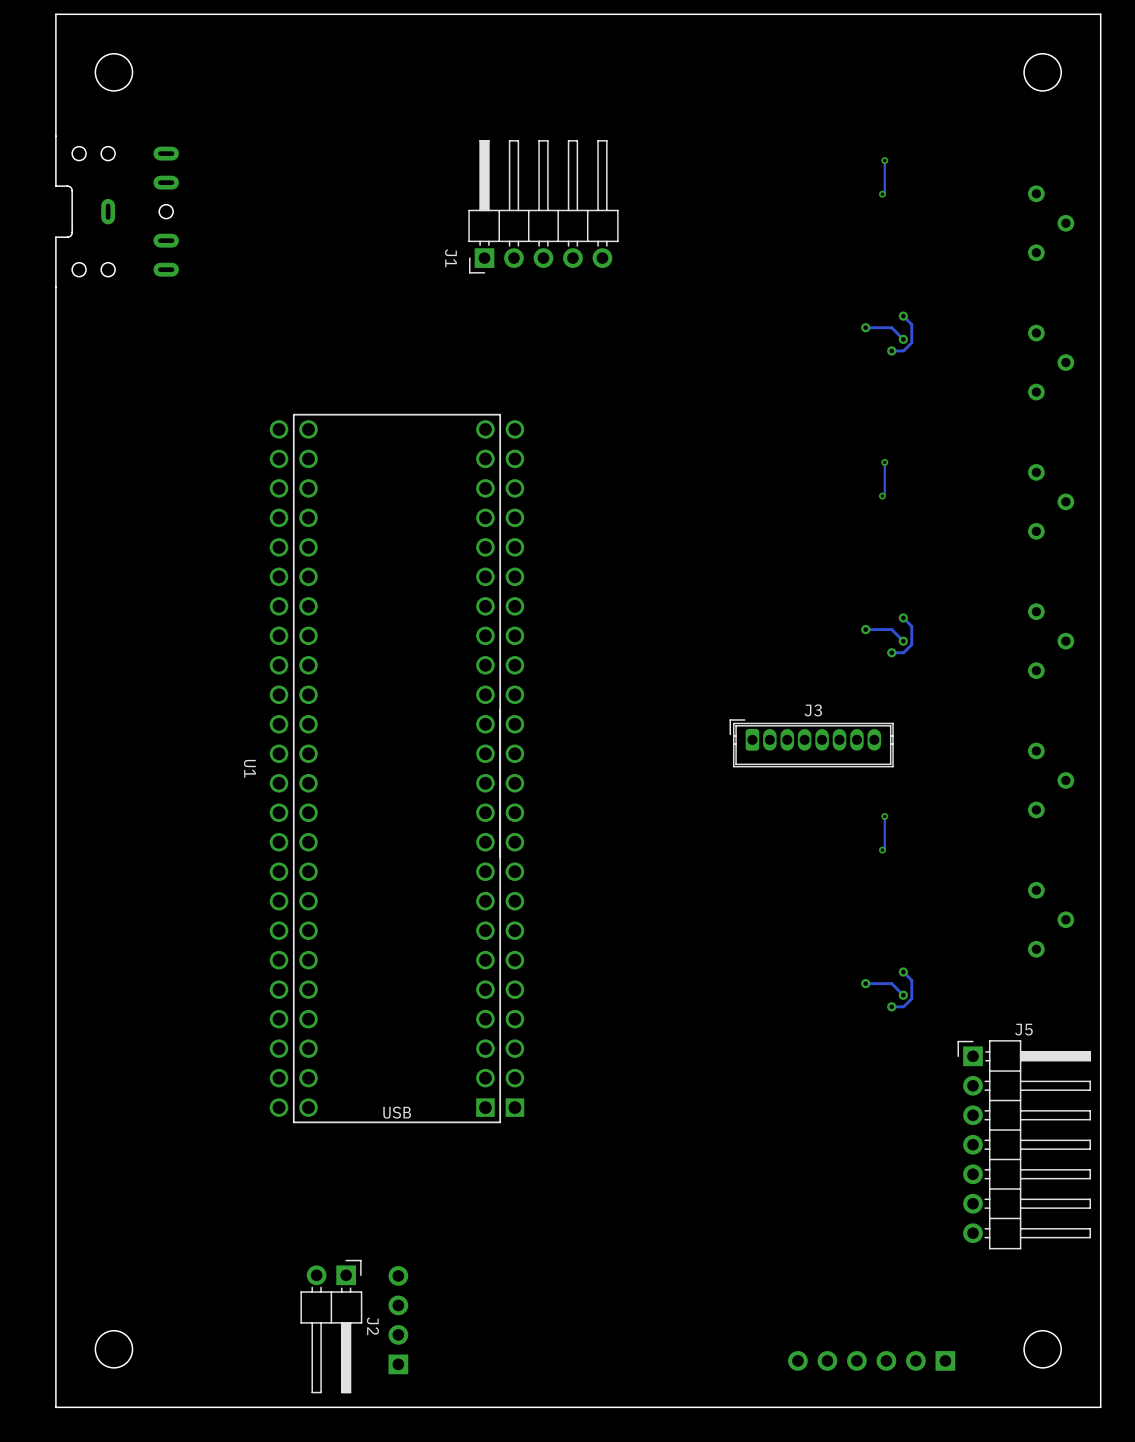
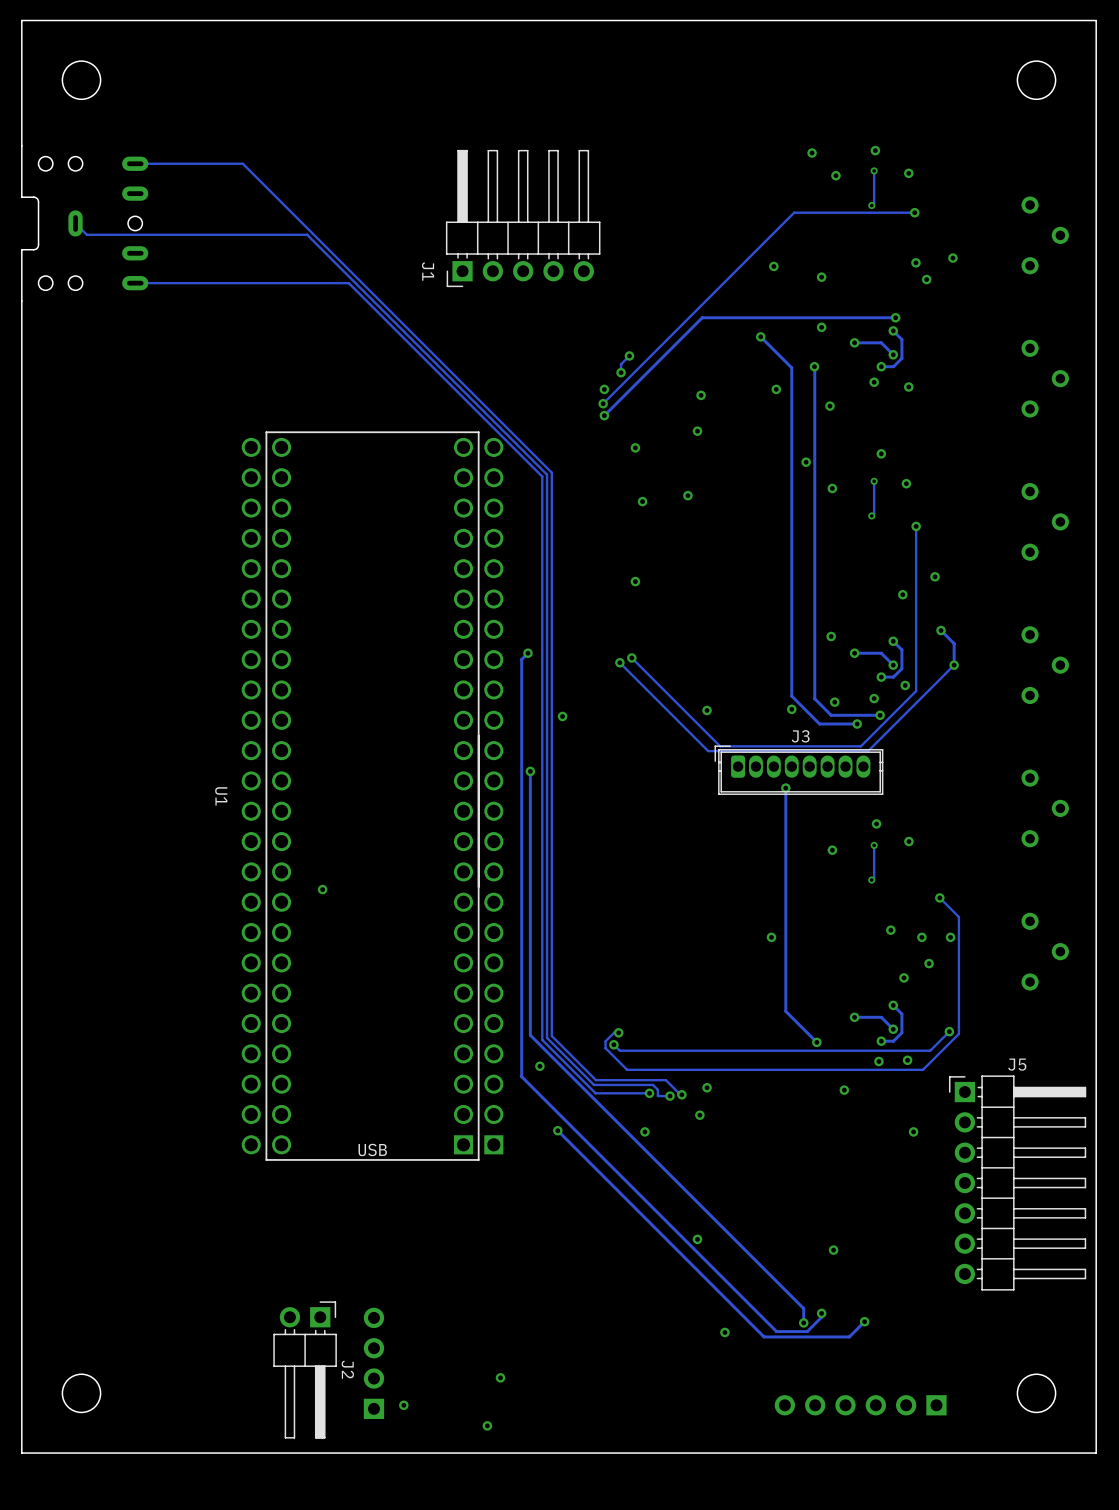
via: none -> (875, 150)
via: none -> (812, 153)
track: none -> (135, 163) (242, 163) (551, 472) (551, 1036) (595, 1080) (665, 1080) (678, 1094) (681, 1094)
via: none -> (908, 173)
via: none -> (835, 175)
track: none -> (914, 212) (794, 212) (603, 403)
via: none -> (914, 212)
track: none -> (75, 223) (86, 234) (307, 234) (547, 474) (547, 1038) (593, 1084) (652, 1084) (657, 1089) (657, 1096) (670, 1096)
via: none -> (952, 258)
via: none -> (915, 262)
via: none -> (773, 266)
via: none -> (821, 277)
via: none -> (926, 279)
track: none -> (135, 283) (348, 283) (542, 476) (542, 1039) (595, 1093) (649, 1093)
track: none -> (895, 317) (702, 317) (604, 415)
via: none -> (895, 317)
via: none -> (821, 327)
track: none -> (760, 336) (791, 367) (791, 696) (819, 724) (857, 724)
via: none -> (760, 336)
track: none -> (629, 355) (621, 364) (621, 372)
via: none -> (629, 355)
track: none -> (814, 366) (814, 698) (831, 715) (880, 715)
via: none -> (814, 366)
via: none -> (621, 372)
via: none -> (874, 382)
via: none -> (908, 387)
via: none -> (604, 389)
via: none -> (776, 389)
via: none -> (701, 395)
via: none -> (603, 403)
via: none -> (829, 406)
via: none -> (604, 415)
via: none -> (697, 431)
via: none -> (635, 447)
via: none -> (881, 453)
via: none -> (806, 462)
via: none -> (906, 483)
via: none -> (832, 488)
via: none -> (687, 495)
via: none -> (642, 501)
track: none -> (916, 526) (916, 691) (860, 746) (720, 746) (631, 657)
via: none -> (916, 526)
via: none -> (935, 576)
via: none -> (635, 581)
via: none -> (902, 594)
track: none -> (941, 630) (954, 643) (954, 665) (868, 751) (708, 751) (619, 662)
via: none -> (941, 630)
via: none -> (831, 636)
track: none -> (527, 653) (521, 659) (521, 1076) (776, 1331) (807, 1331) (821, 1317) (821, 1313)
via: none -> (527, 653)
via: none -> (631, 657)
via: none -> (619, 662)
via: none -> (954, 665)
via: none -> (905, 685)
via: none -> (874, 698)
via: none -> (834, 702)
via: none -> (791, 709)
via: none -> (707, 710)
via: none -> (880, 715)
via: none -> (562, 716)
via: none -> (857, 724)
track: none -> (530, 771) (530, 1035) (803, 1308) (803, 1322)
via: none -> (530, 771)
track: none -> (785, 788) (785, 1011) (816, 1042)
via: none -> (785, 788)
via: none -> (876, 823)
via: none -> (908, 841)
via: none -> (832, 850)
via: none -> (322, 889)
track: none -> (939, 897) (958, 917) (958, 1033) (922, 1069) (627, 1069) (605, 1048) (605, 1041) (614, 1032) (618, 1032)
via: none -> (939, 897)
via: none -> (890, 930)
via: none -> (771, 937)
via: none -> (921, 937)
via: none -> (950, 937)
via: none -> (929, 963)
via: none -> (904, 977)
track: none -> (949, 1031) (930, 1050) (619, 1050) (613, 1044)
via: none -> (949, 1031)
via: none -> (618, 1032)
via: none -> (816, 1042)
via: none -> (613, 1044)
via: none -> (907, 1060)
via: none -> (878, 1061)
via: none -> (539, 1066)
via: none -> (707, 1087)
via: none -> (844, 1090)
via: none -> (649, 1093)
via: none -> (681, 1094)
via: none -> (670, 1096)
via: none -> (699, 1115)
track: none -> (557, 1130) (764, 1336) (849, 1336) (864, 1321)
via: none -> (557, 1130)
via: none -> (644, 1131)
via: none -> (913, 1131)
via: none -> (697, 1239)
via: none -> (833, 1250)
via: none -> (821, 1313)
via: none -> (864, 1321)
via: none -> (803, 1322)
via: none -> (724, 1332)
via: none -> (500, 1377)
via: none -> (403, 1405)
via: none -> (487, 1425)

